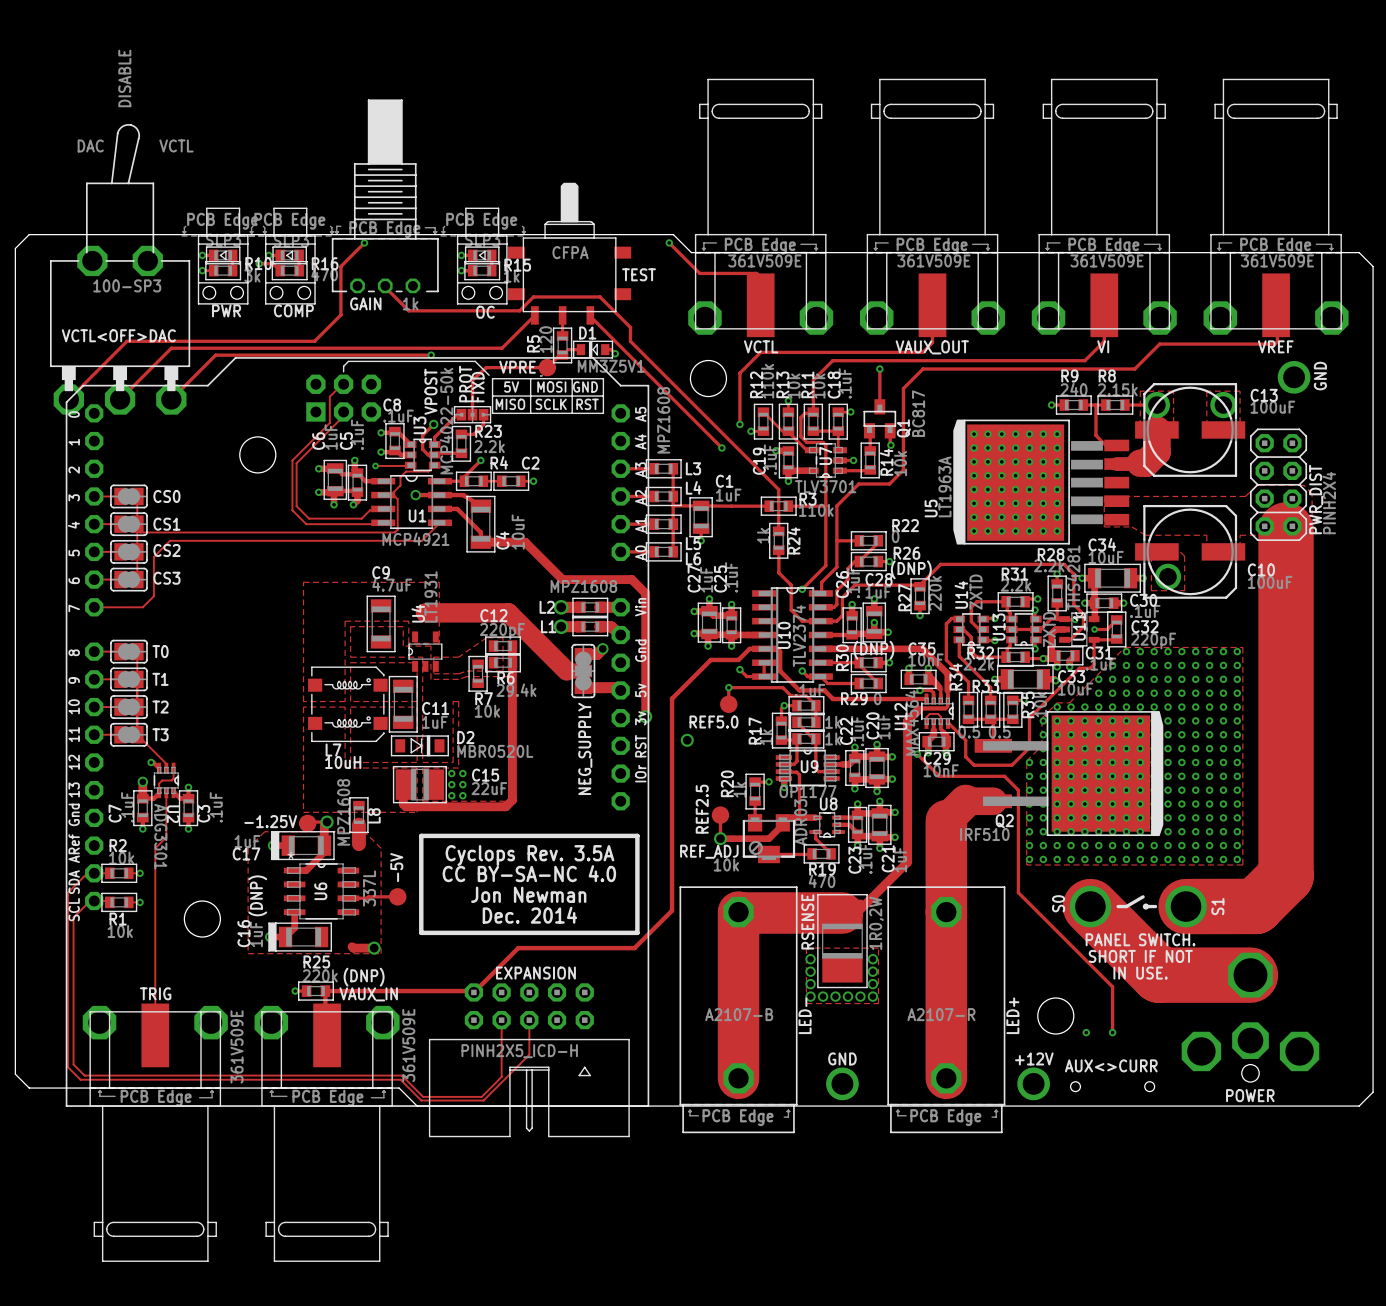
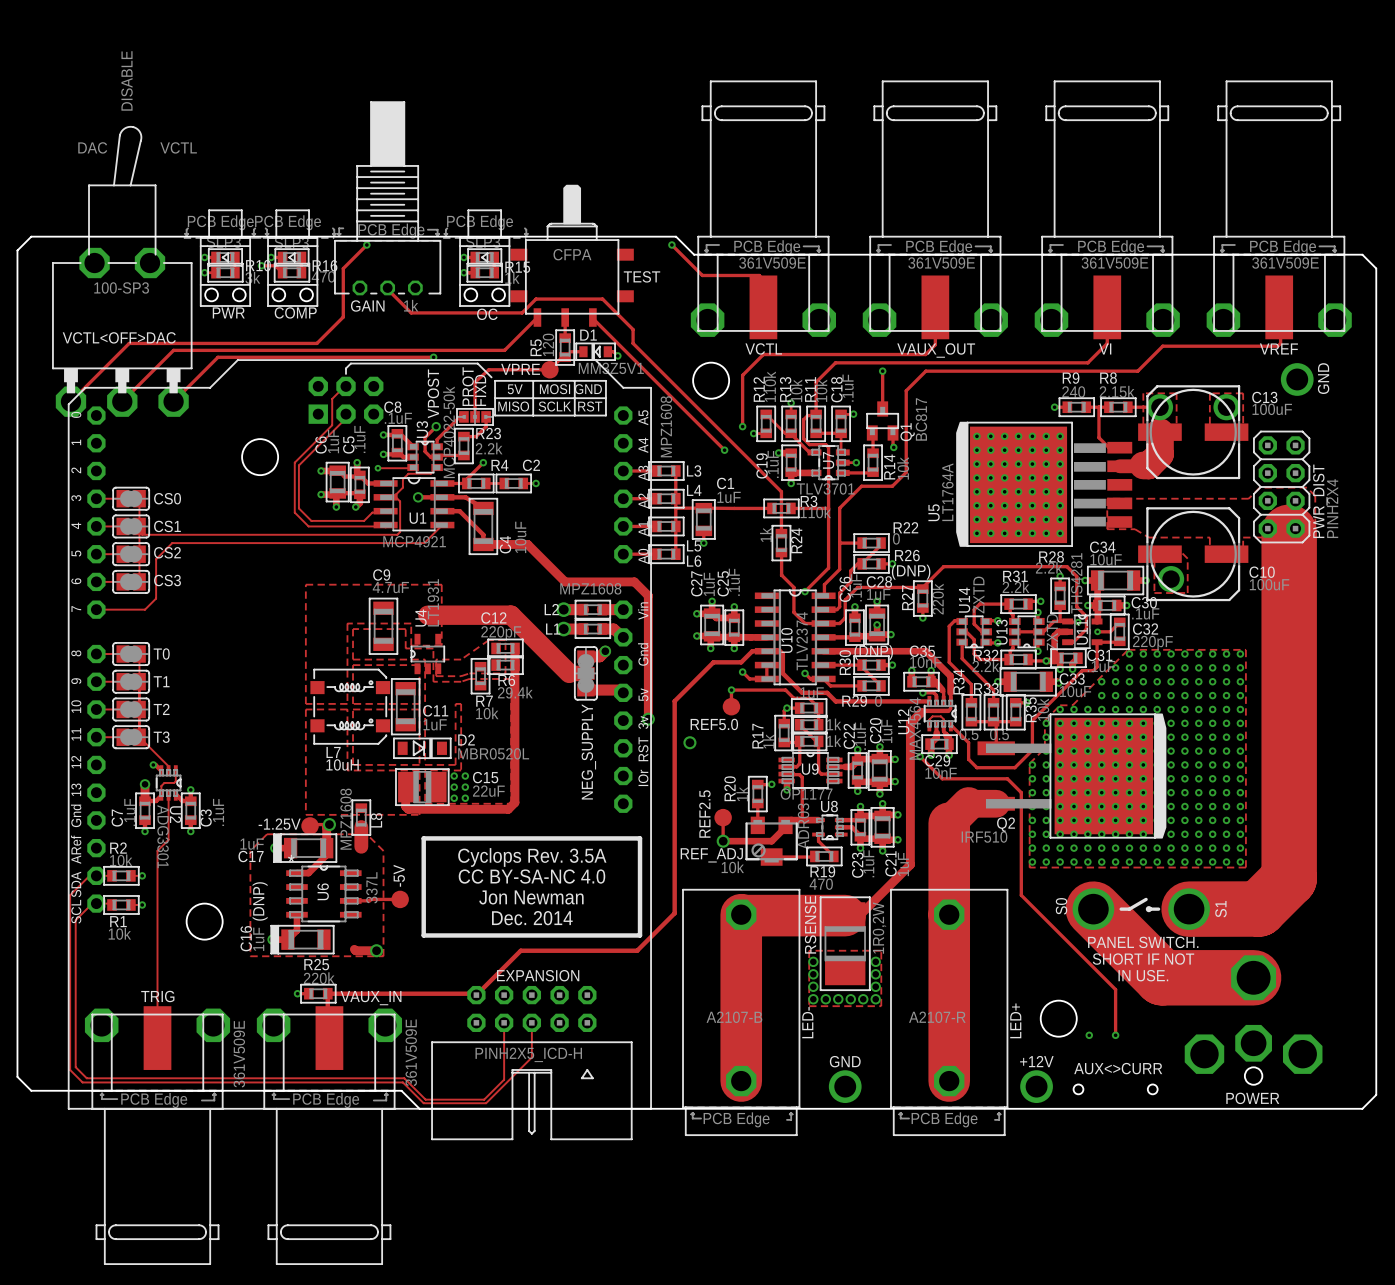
U5 value: LT1963A (944, 486) -> LT1764A (947, 492)
text: (DNP) (364, 977) -> none

